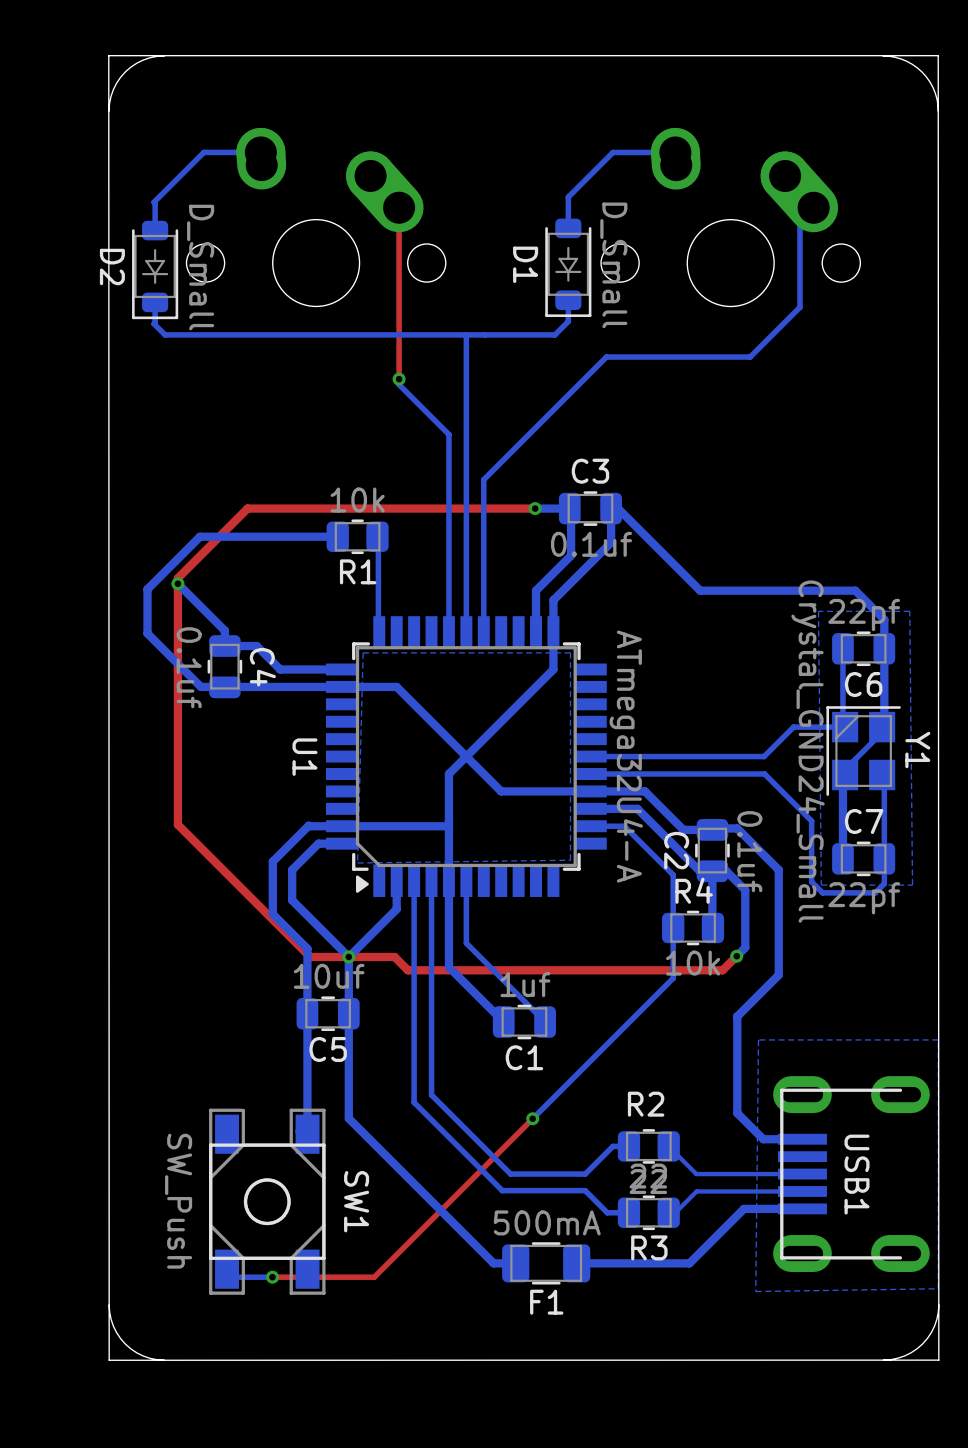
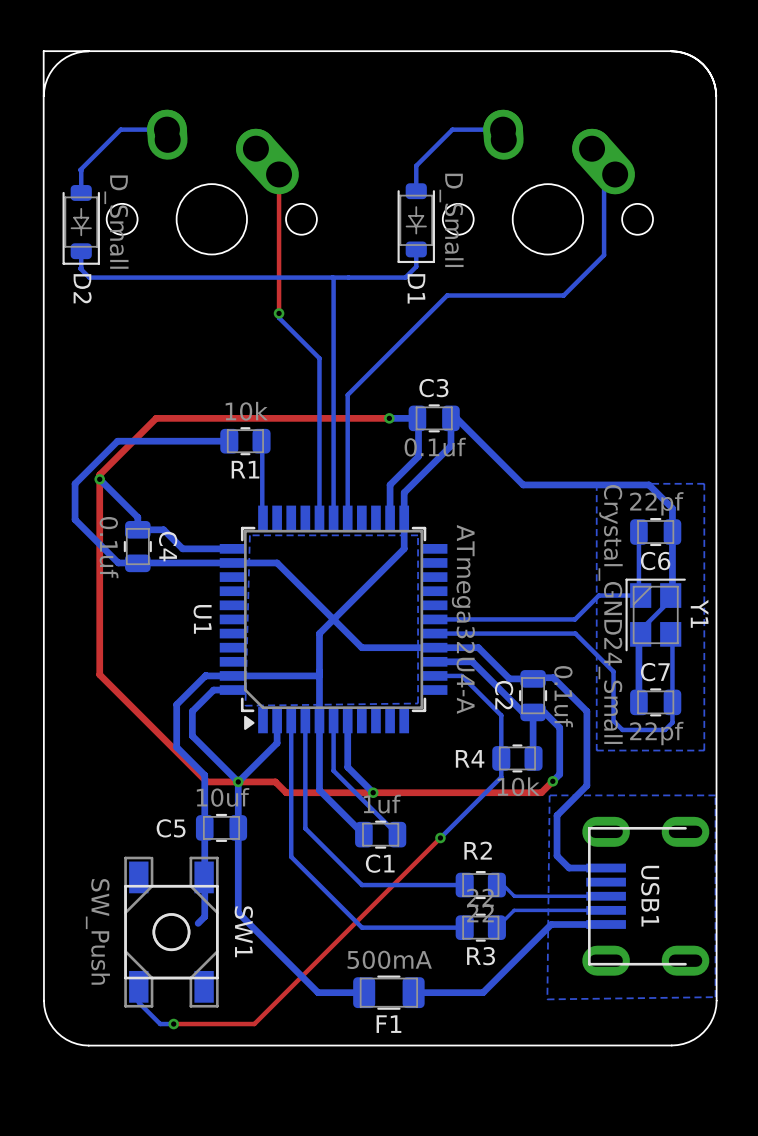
board edge: (882, 55) (938, 55) (938, 1360) (109, 1360) (109, 1226) -> (671, 51) (688, 54) (703, 64) (712, 78) (716, 96) (716, 1000) (715, 1012) (710, 1023) (703, 1032) (694, 1039) (683, 1043) (671, 1045) (88, 1045) (71, 1042) (57, 1032) (47, 1017) (43, 1000)
D1 name position: D1 (525, 264) -> D1 (416, 288)
D2 name position: D2 (112, 266) -> D2 (82, 288)
bottom zone outline: (909, 611) (818, 611) (821, 885) (912, 885) (909, 611) -> (704, 483) (704, 750) (596, 750) (596, 483) (704, 483)
bottom track: none -> (347, 720) (347, 767) (373, 792)
R4 name position: R4 (694, 890) -> R4 (470, 758)
bottom track: (673, 951) (673, 978) (532, 1118) -> (501, 777) (440, 837)
bottom track: (778, 961) (778, 975) (737, 1016) (737, 1113) (763, 1139) (802, 1139) -> (586, 785) (557, 815) (557, 855) (569, 868) (606, 868)
via: none -> (373, 792)
bottom track: (431, 1014) (431, 1094) (510, 1174) (585, 1174) (612, 1146) (628, 1146) -> (305, 828) (361, 885) (464, 885)
top track: none -> (440, 837) (254, 1024) (173, 1024)
via: none -> (440, 837)
bottom zone outline: (938, 1039) (758, 1039) (755, 1291) (938, 1288) (938, 1039) -> (715, 795) (715, 997) (547, 999) (549, 795) (715, 795)
C5 name position: C5 (328, 1049) -> C5 (171, 828)
bottom track: (414, 1049) (414, 1102) (502, 1190) (585, 1190) (607, 1212) (628, 1212) -> (291, 856) (361, 927) (464, 927)
bottom track: none -> (496, 885) (503, 885) (514, 896) (606, 896)
bottom track: none -> (606, 910) (514, 910) (496, 927)
top track: (532, 1118) (374, 1277) (272, 1277) -> none
via: (532, 1118) -> none
bottom track: none -> (606, 924) (551, 924) (483, 992) (413, 992)
R2 position: (648, 1146) -> (480, 885)
bottom track: (668, 1146) (696, 1174) (802, 1174) -> none
USB1 position: (851, 1174) -> (645, 896)
bottom track: (802, 1191) (696, 1191) (675, 1212) (668, 1212) -> none
SW1 position: (267, 1201) -> (171, 932)
bottom track: (802, 1208) (743, 1208) (689, 1263) (576, 1263) -> none
bottom track: none -> (138, 986) (138, 1002) (160, 1024) (173, 1024)
R3 position: (648, 1212) -> (480, 927)
bottom track: (447, 1216) (493, 1263) (515, 1263) -> (318, 992) (364, 992)
F1 position: (546, 1263) -> (388, 992)
bottom track: (227, 1269) (227, 1274) (229, 1277) (272, 1277) -> none
via position: (272, 1277) -> (173, 1024)
board edge: (109, 1304) (113, 1326) (125, 1344) (143, 1356) (164, 1360) -> none
board edge: (938, 1304) (934, 1326) (922, 1343) (904, 1355) (883, 1360) -> none

